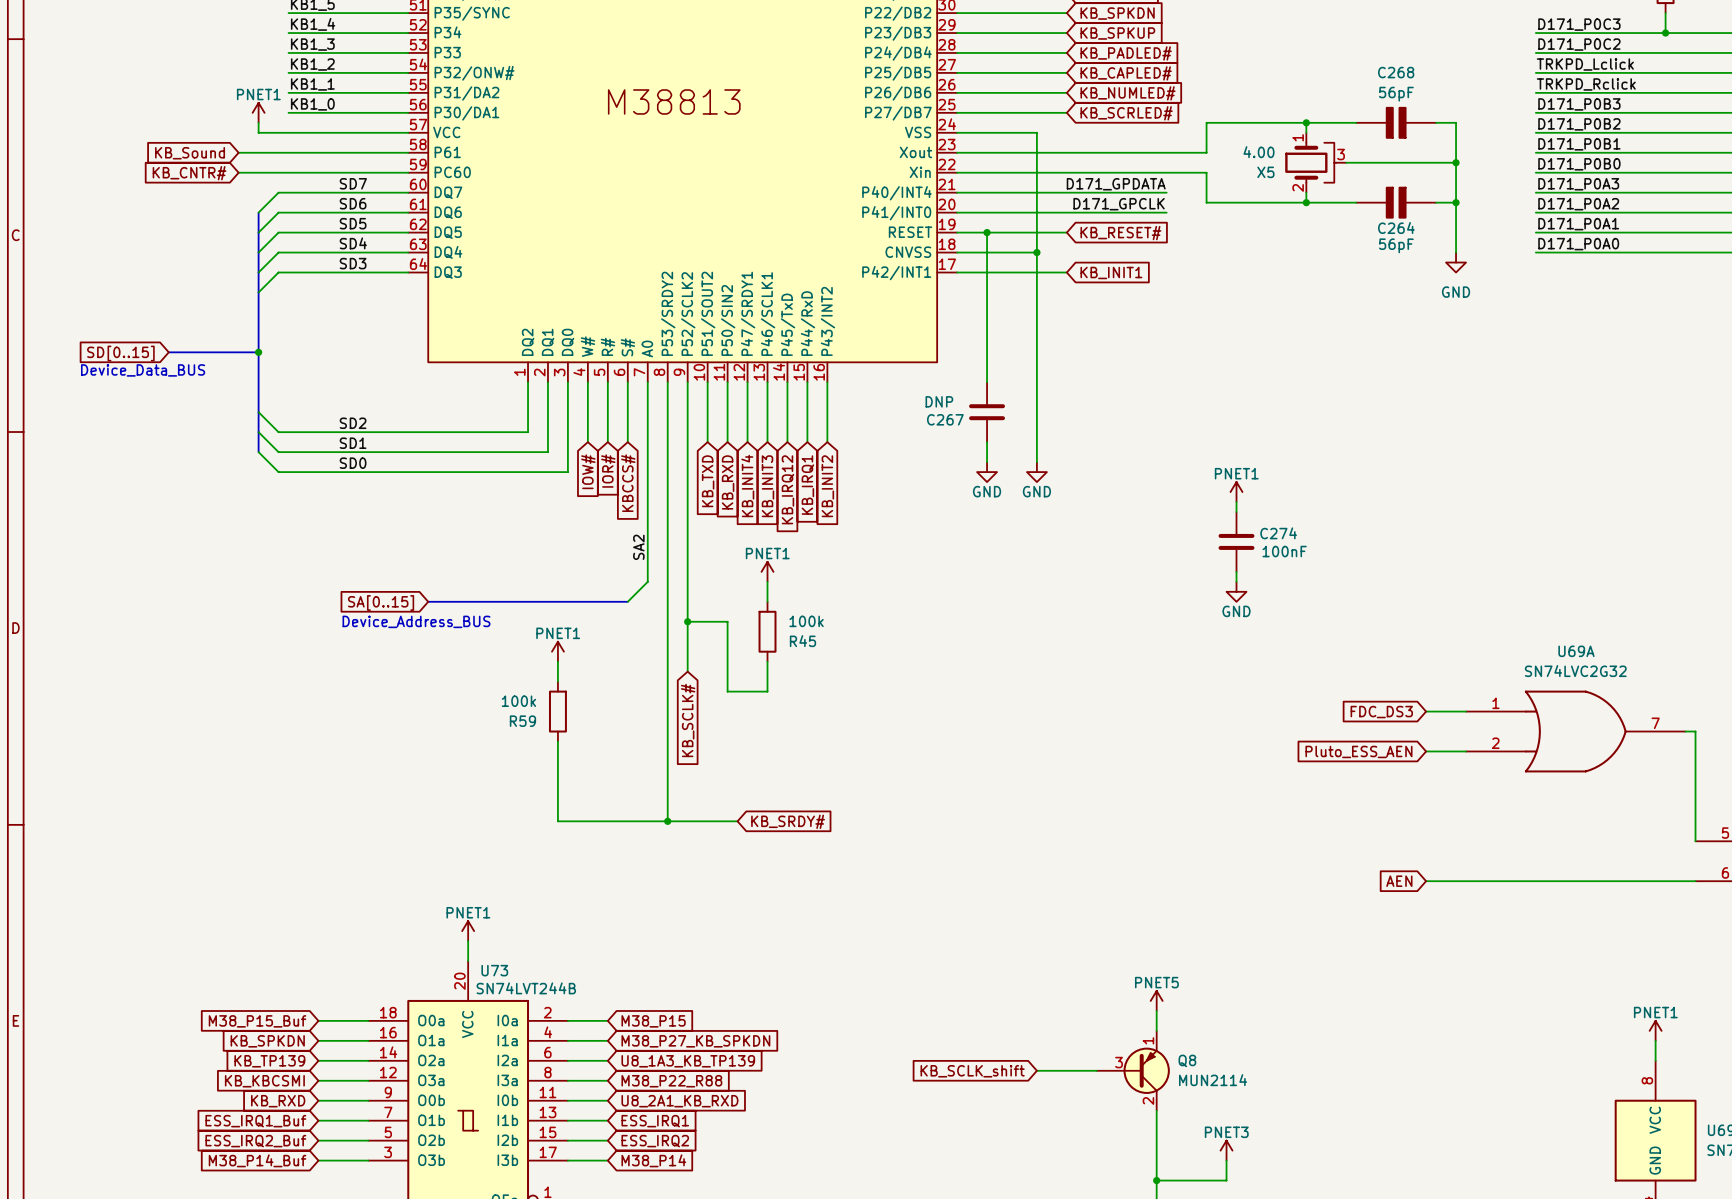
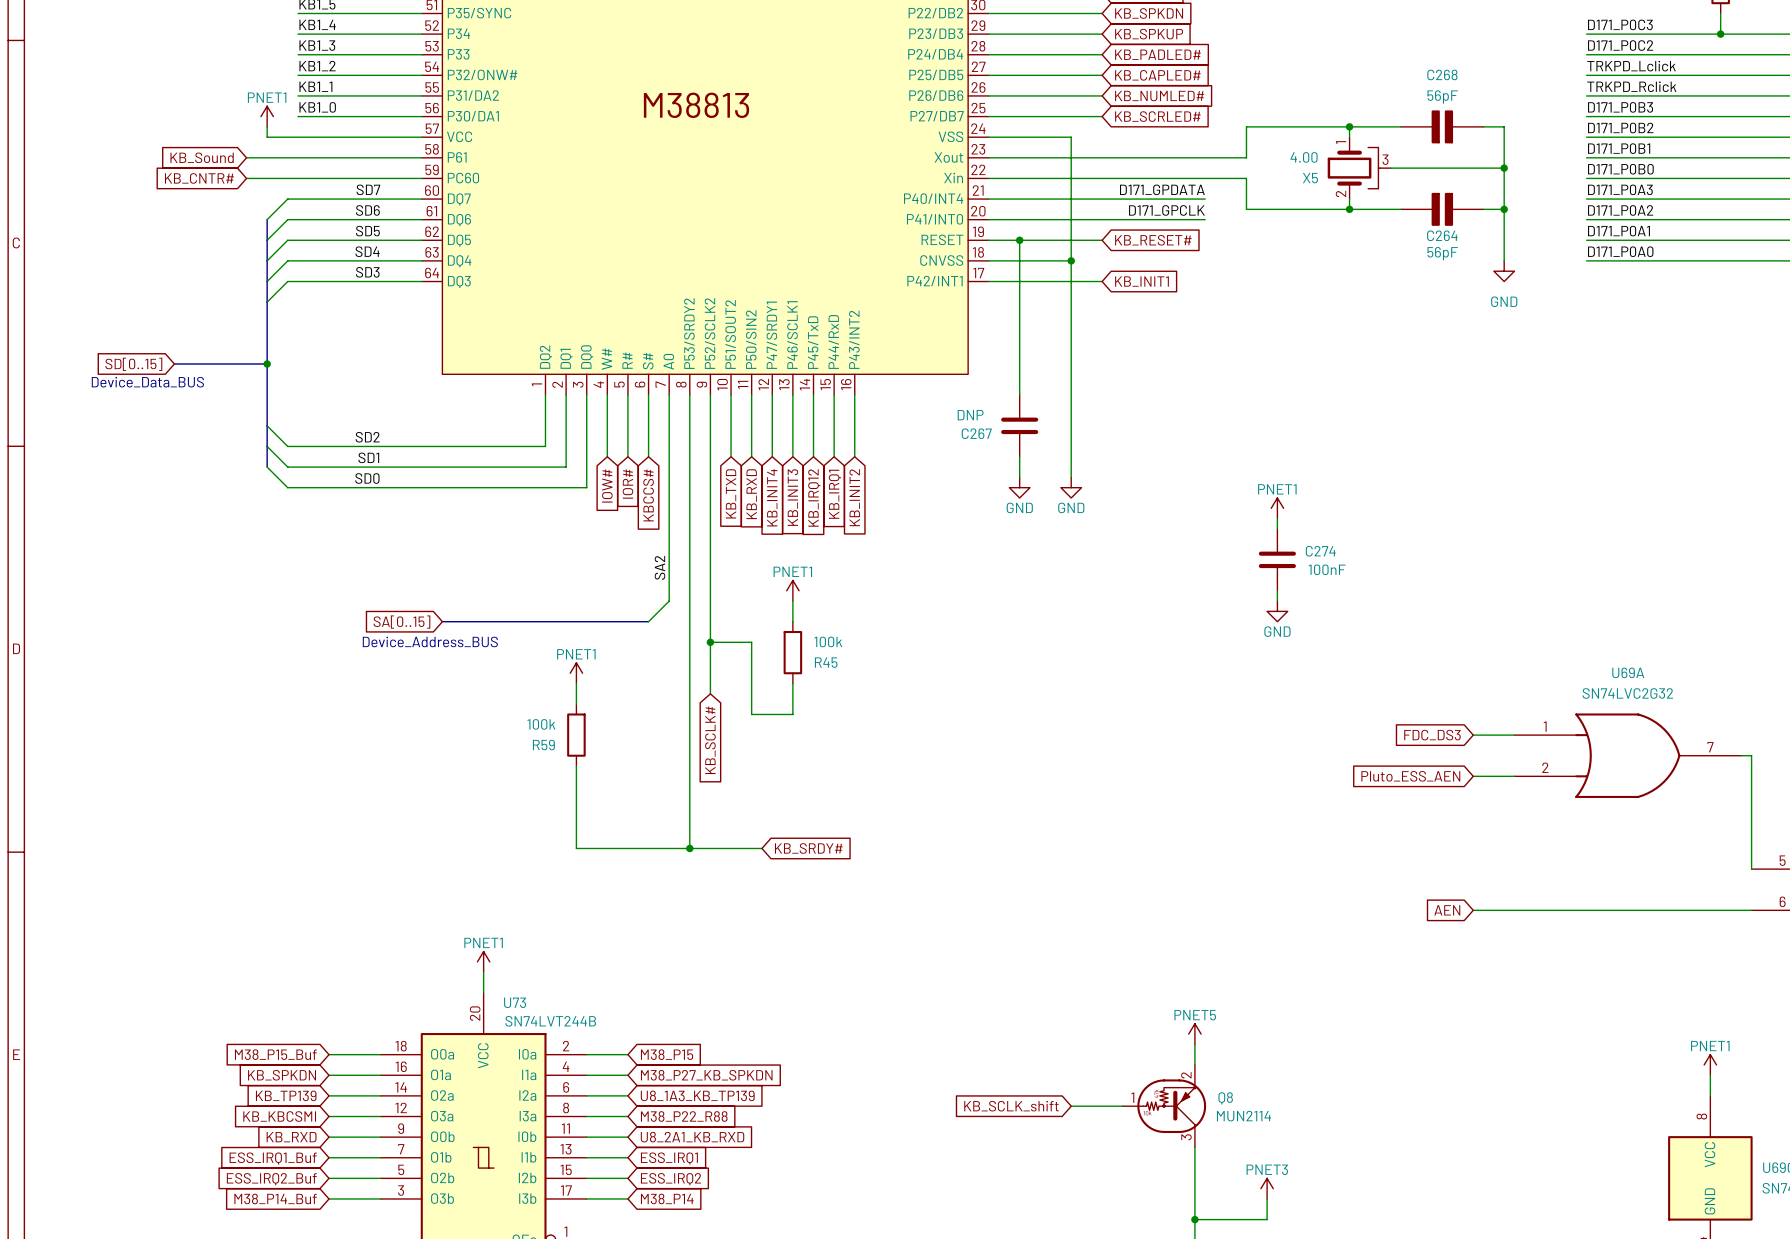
Q8 symbol: [1096, 1030, 1170, 1111] -> [1122, 1064, 1207, 1148]

